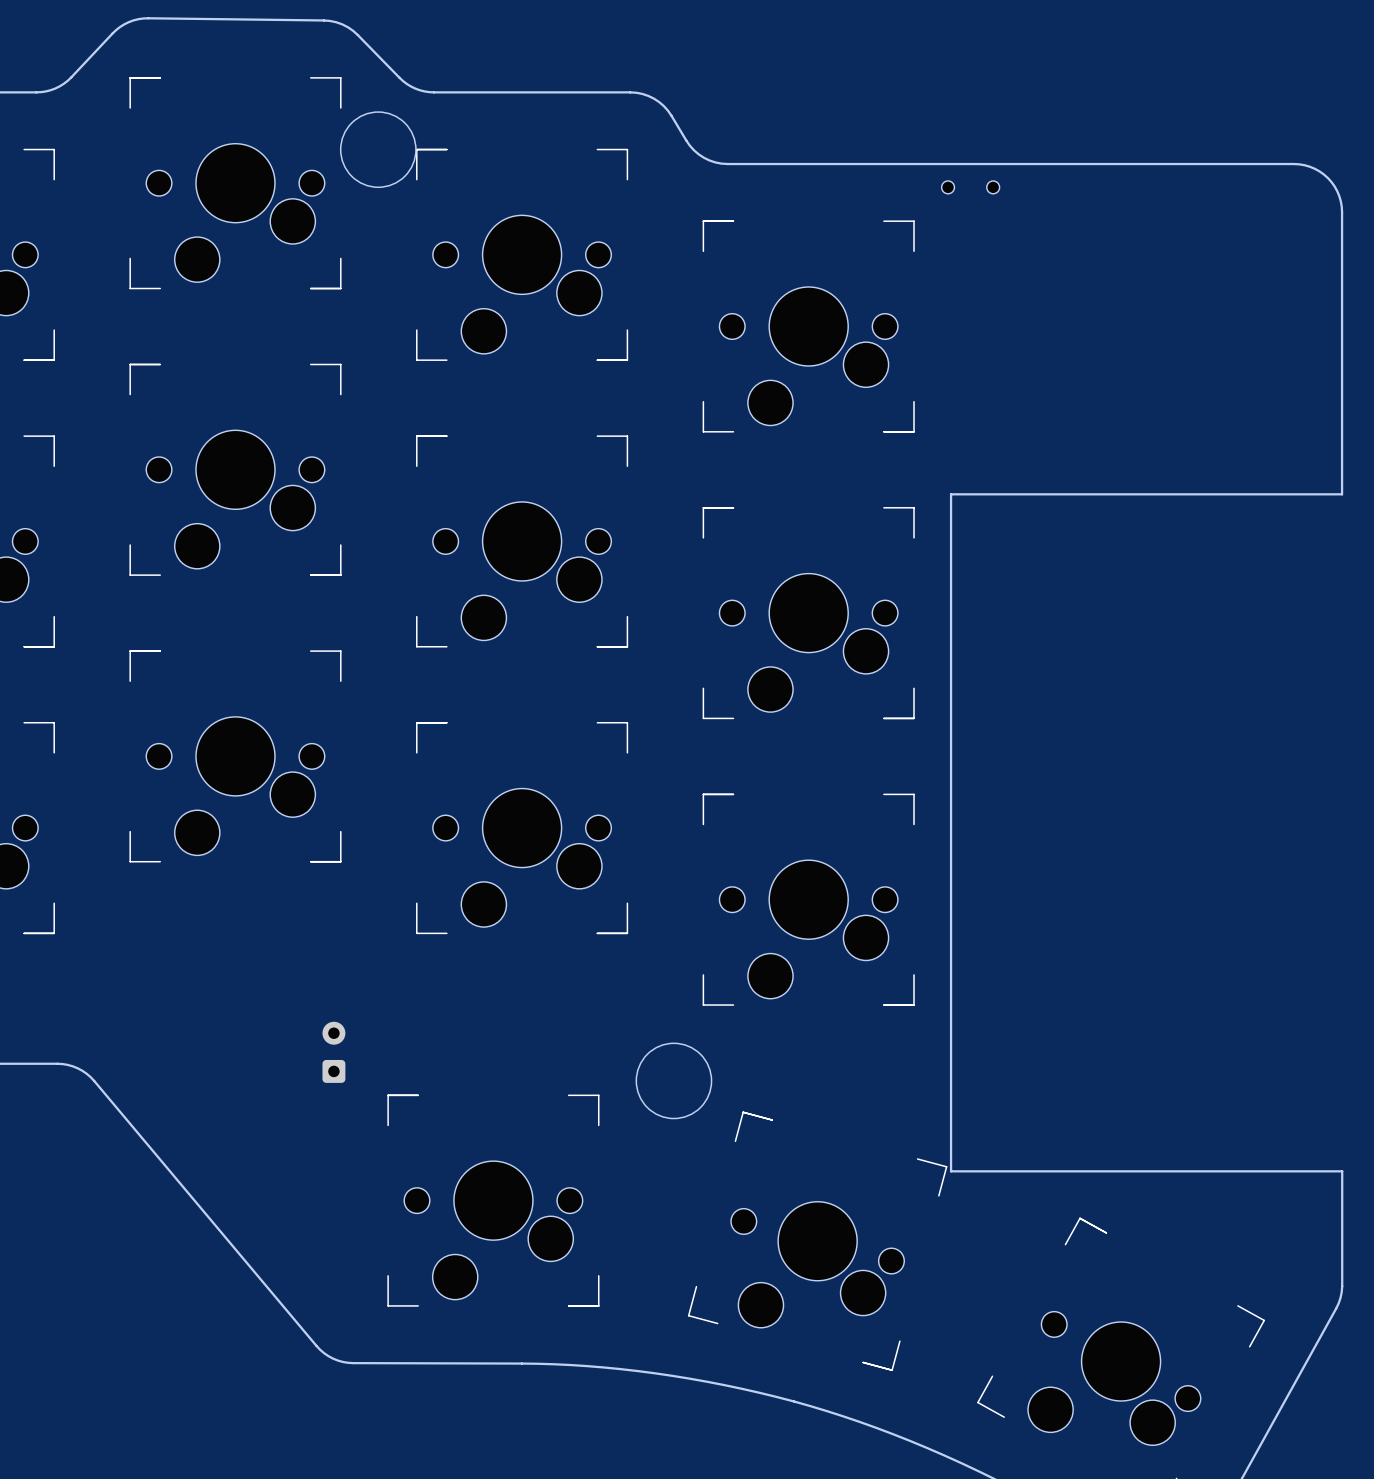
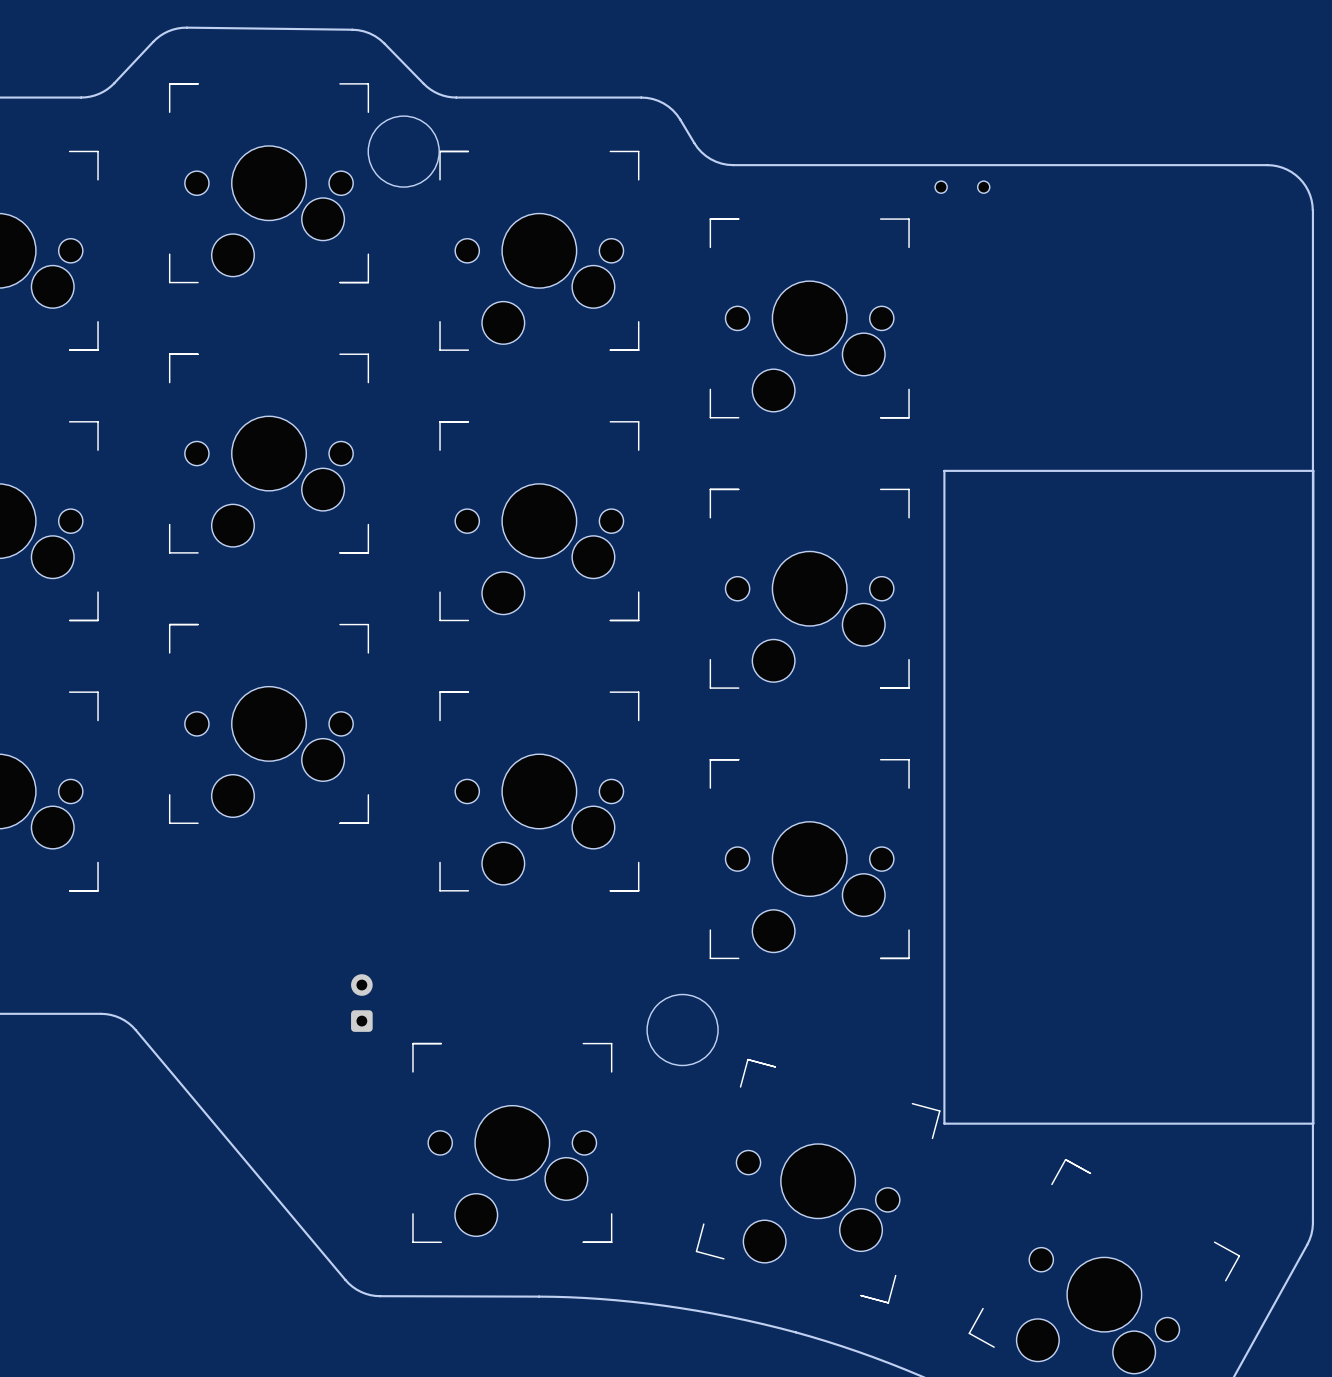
board edge: (1342, 212) (1342, 494) (951, 494) (951, 1171) (1342, 1171) -> (1312, 210) (1312, 1115)
board edge: none -> (944, 470) (1313, 470) (1313, 1123) (944, 1123) (944, 470)

